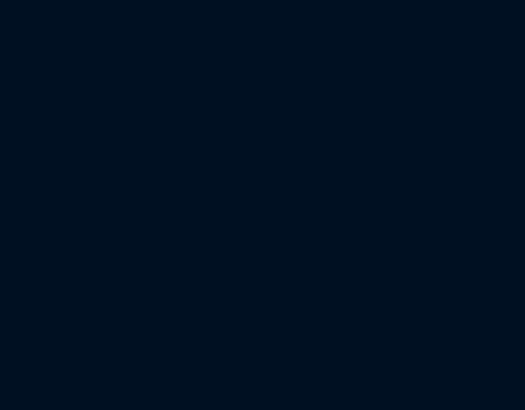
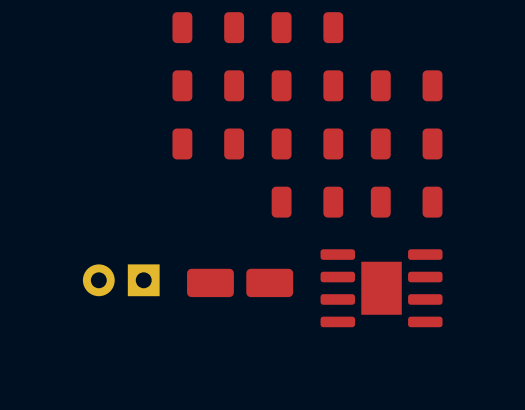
part: none -> (208, 27)
part: none -> (307, 27)
part: none -> (208, 85)
part: none -> (307, 85)
part: none -> (406, 85)
part: none -> (208, 143)
part: none -> (307, 143)
part: none -> (406, 143)
part: none -> (307, 202)
part: none -> (406, 202)
part: none -> (121, 280)
part: none -> (240, 282)
part: none -> (381, 288)

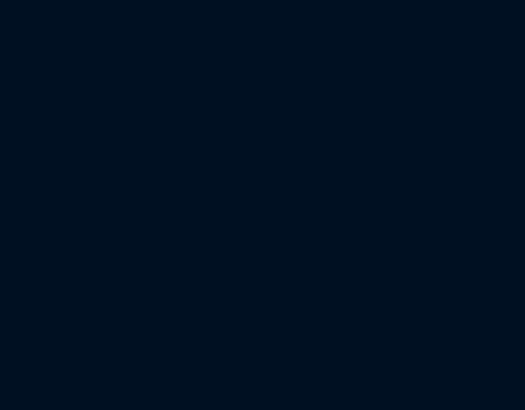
part: (208, 27) -> none
part: (307, 27) -> none
part: (208, 85) -> none
part: (307, 85) -> none
part: (406, 85) -> none
part: (208, 143) -> none
part: (307, 143) -> none
part: (406, 143) -> none
part: (307, 202) -> none
part: (406, 202) -> none
part: (121, 280) -> none
part: (240, 282) -> none
part: (381, 288) -> none

